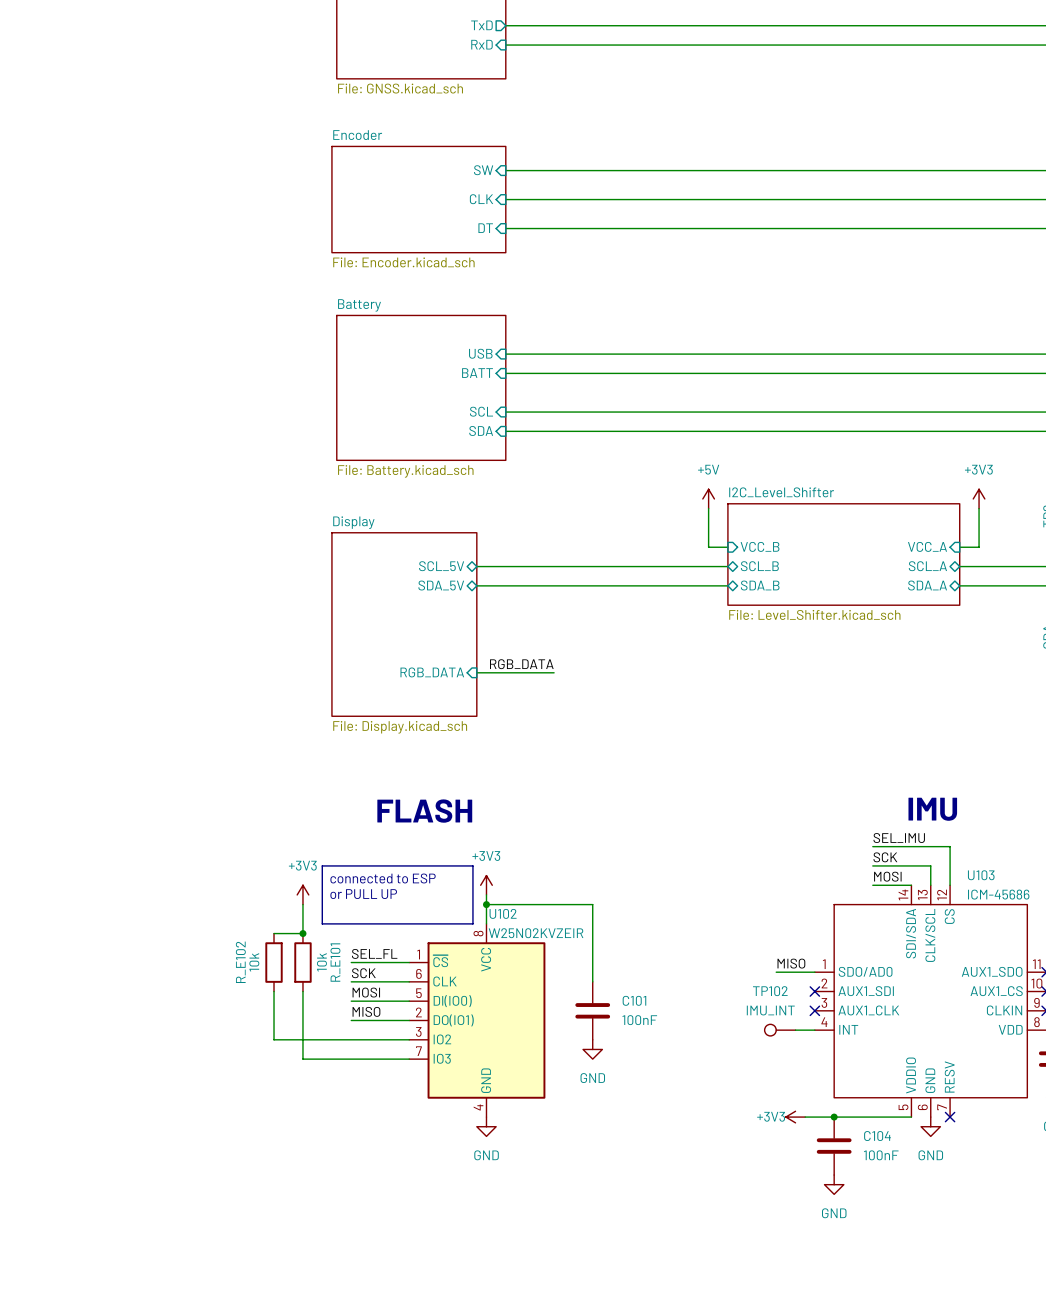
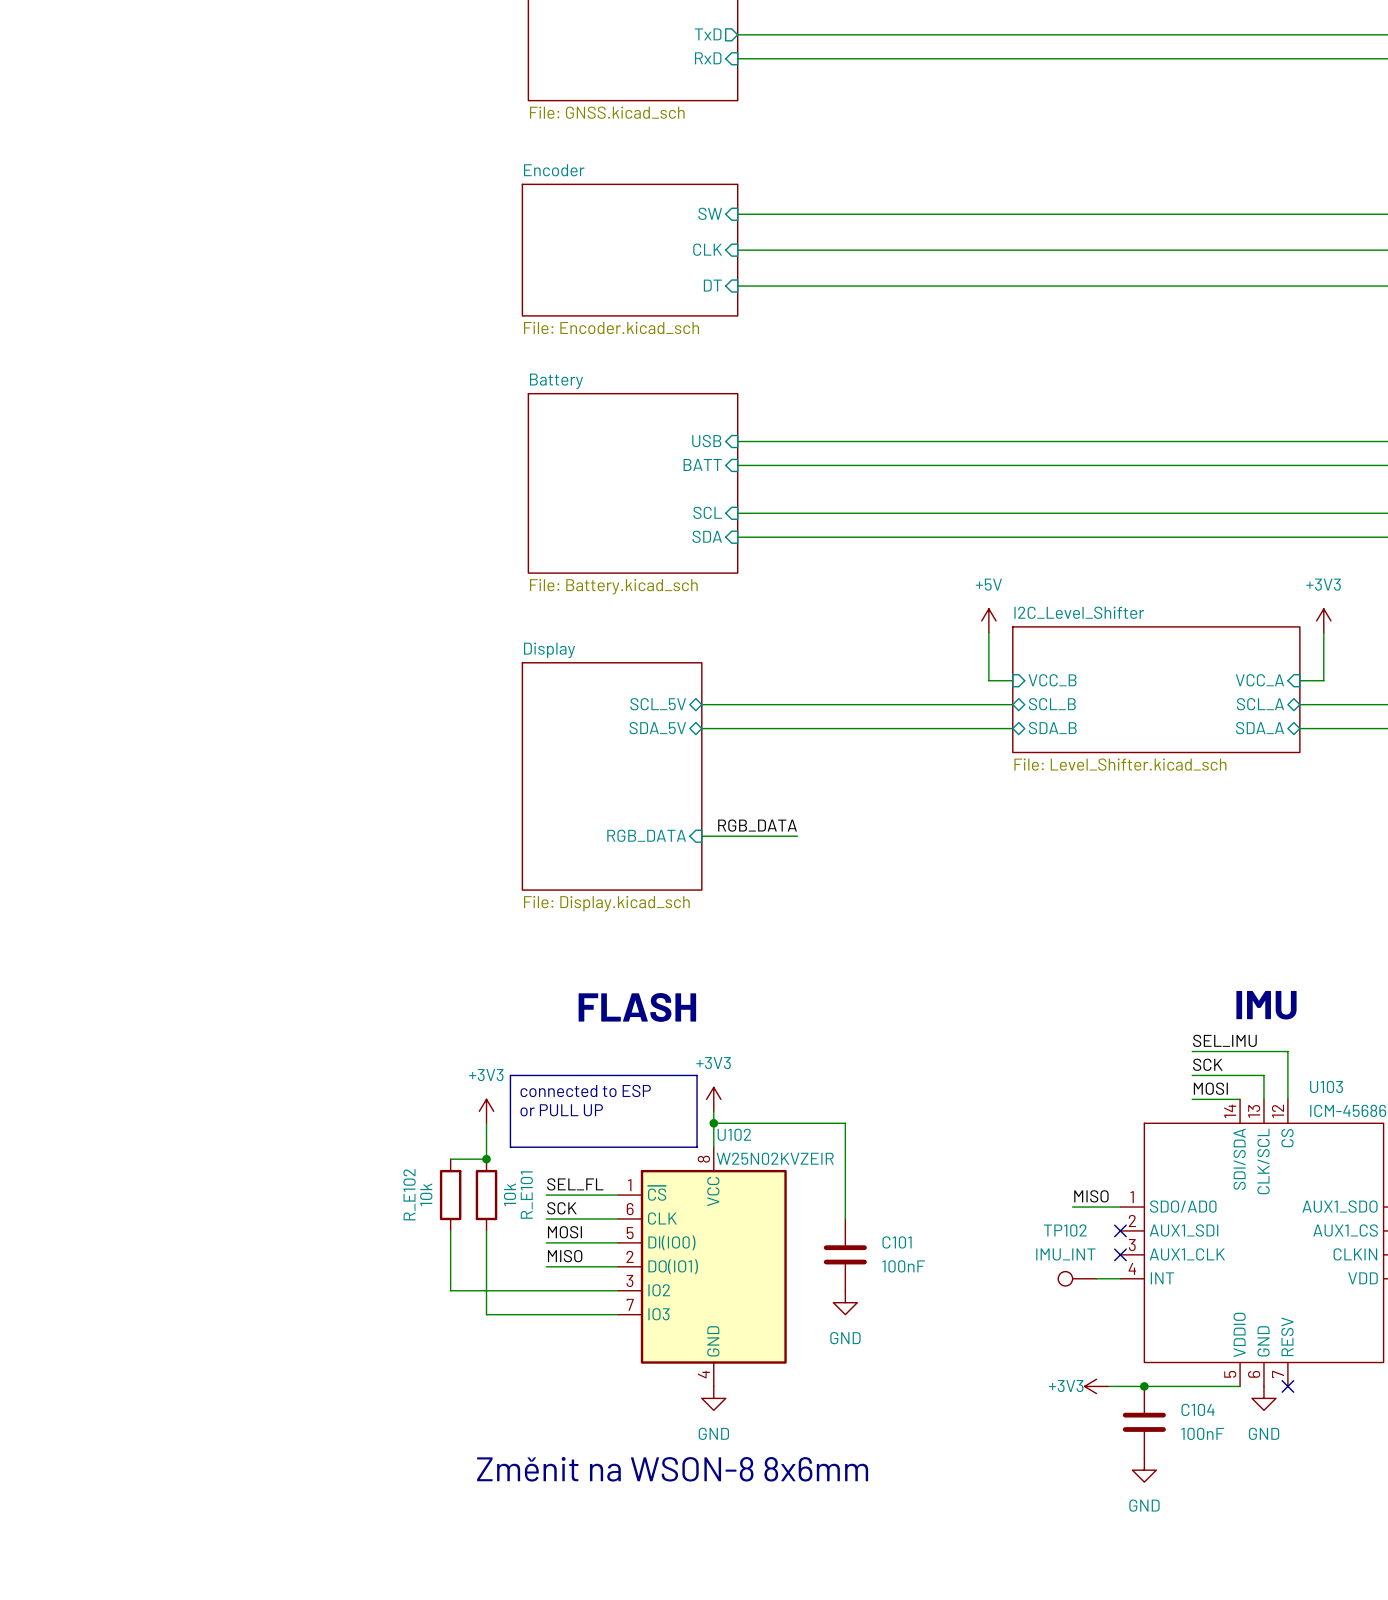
text: none -> Změnit na WSON-8 8x6mm (672, 1469)

